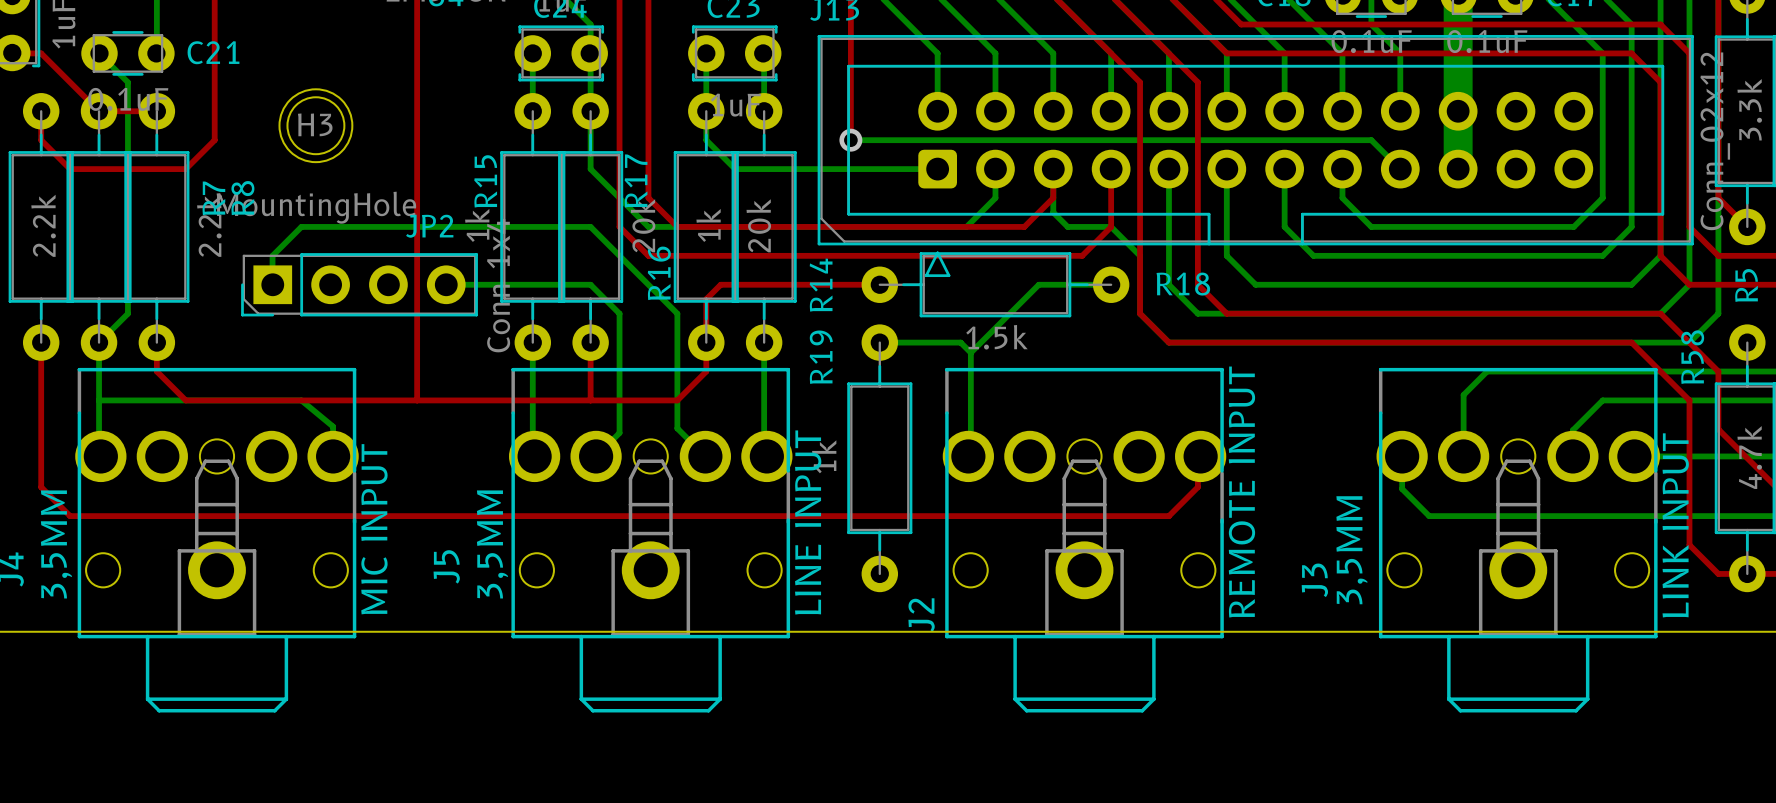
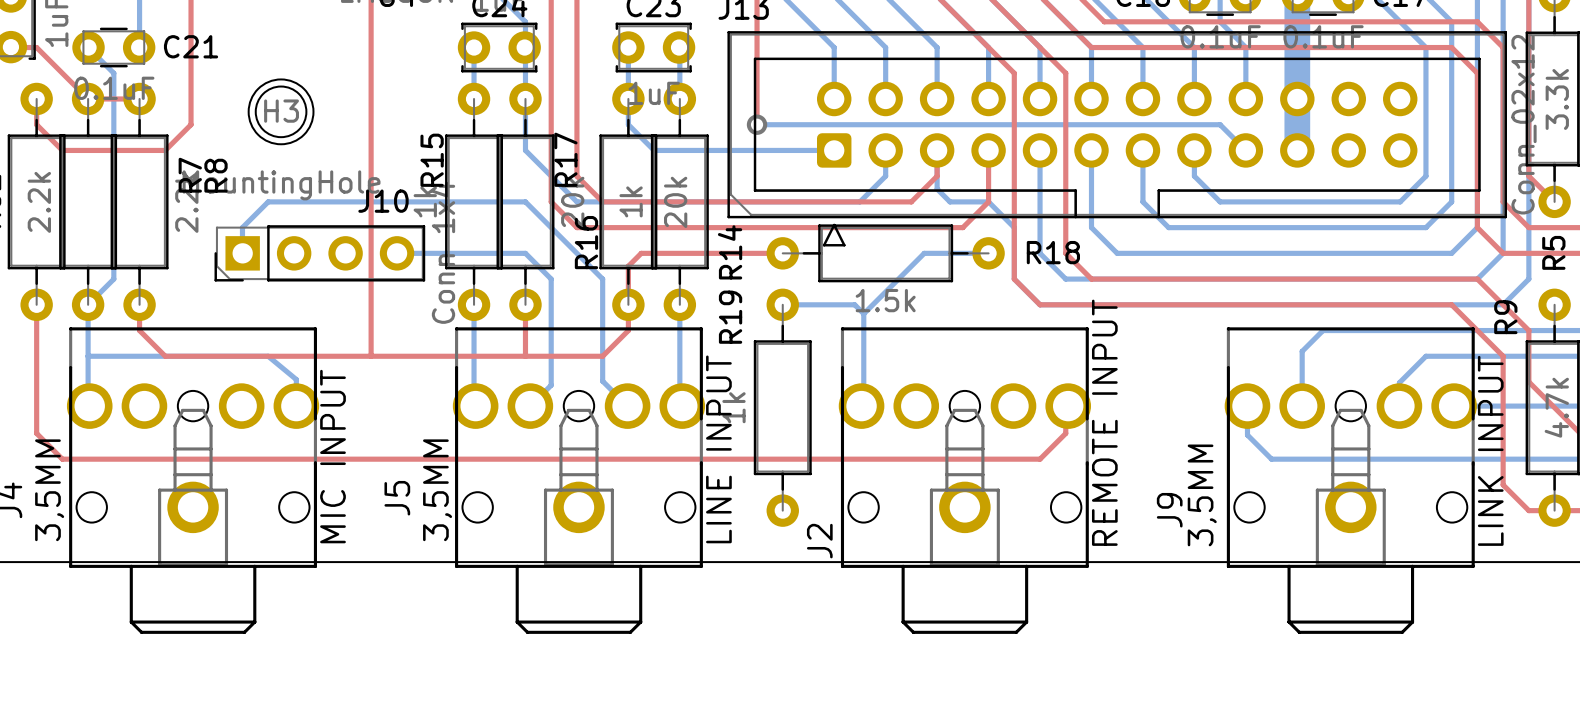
JP2 name: JP2 (429, 226) -> J10 (383, 201)
R58 name: R58 (1692, 357) -> R9 (1505, 317)
J3 name: J3 (1314, 580) -> J9 (1169, 510)

